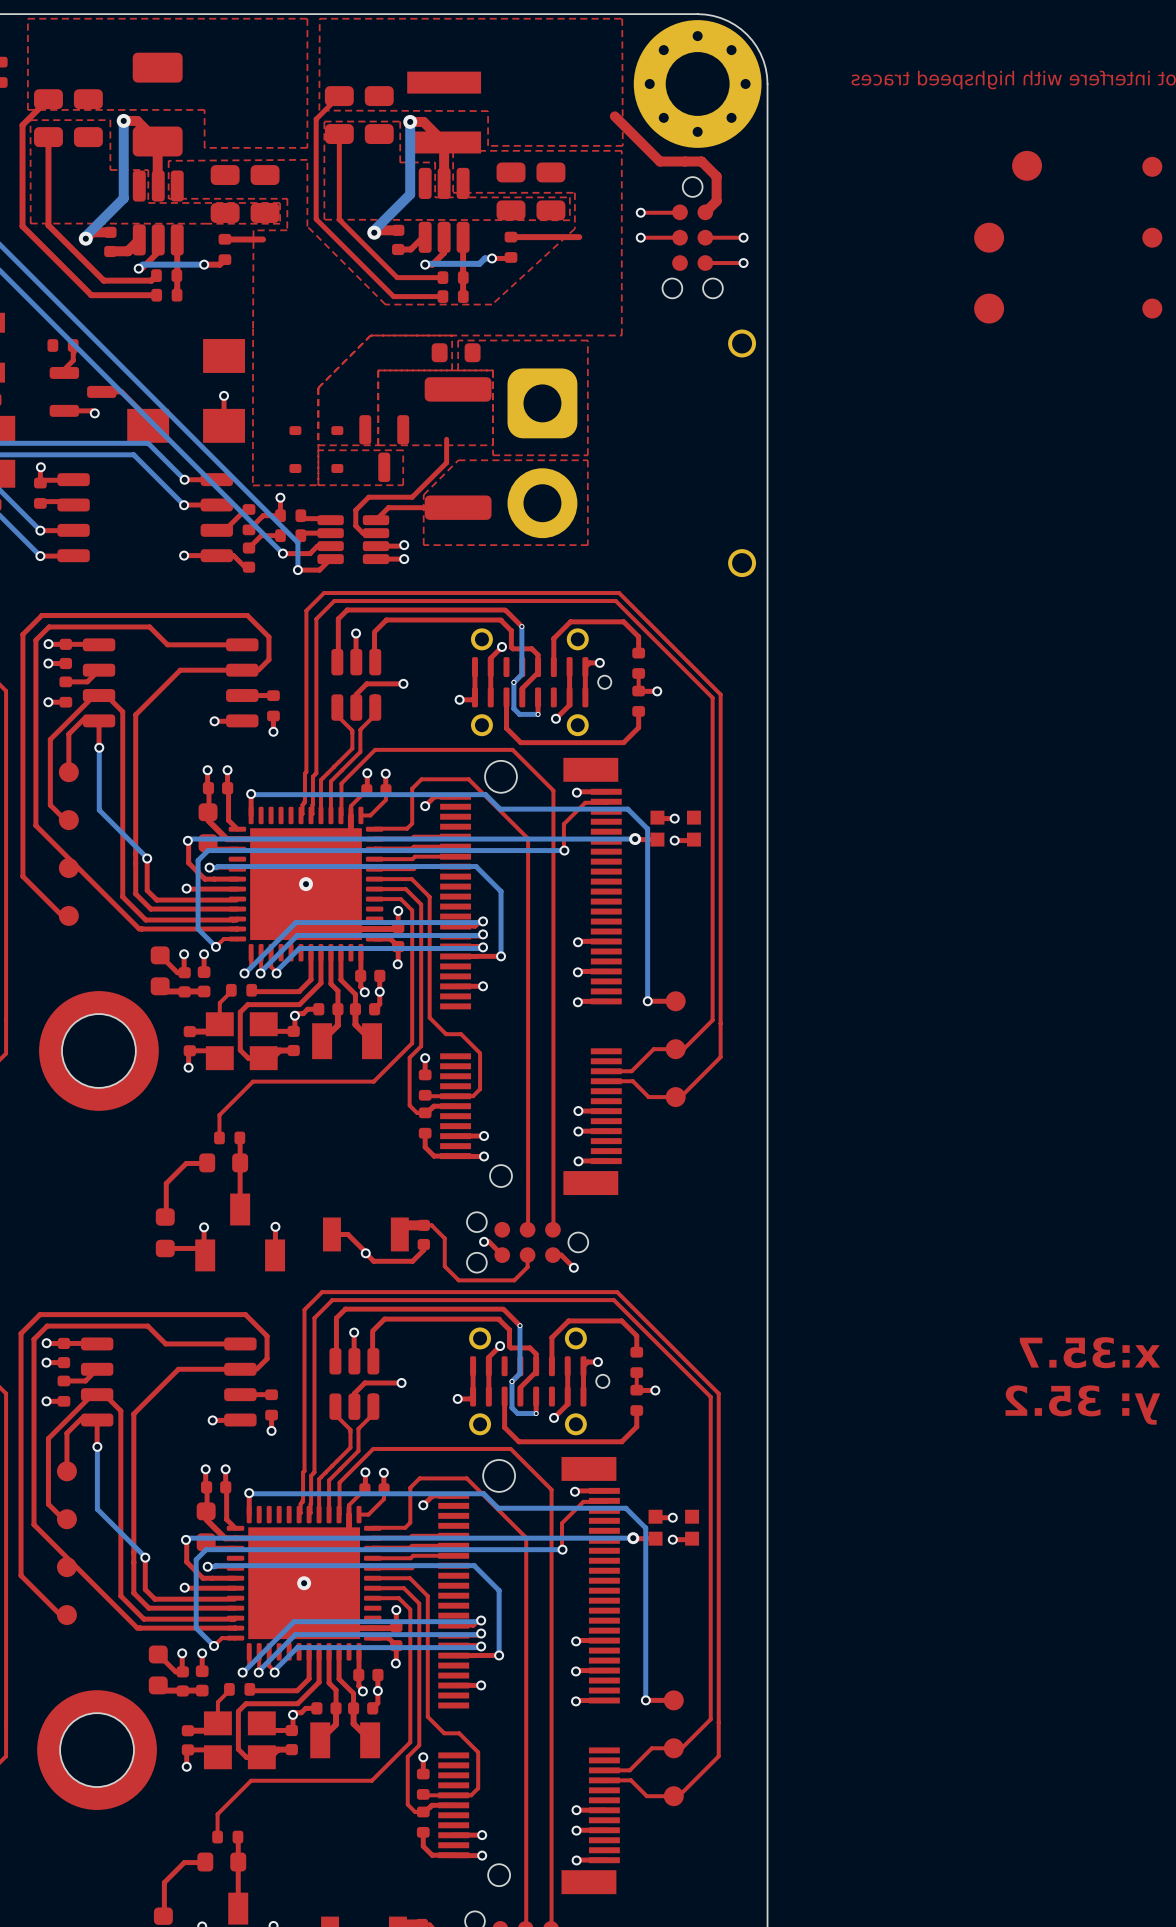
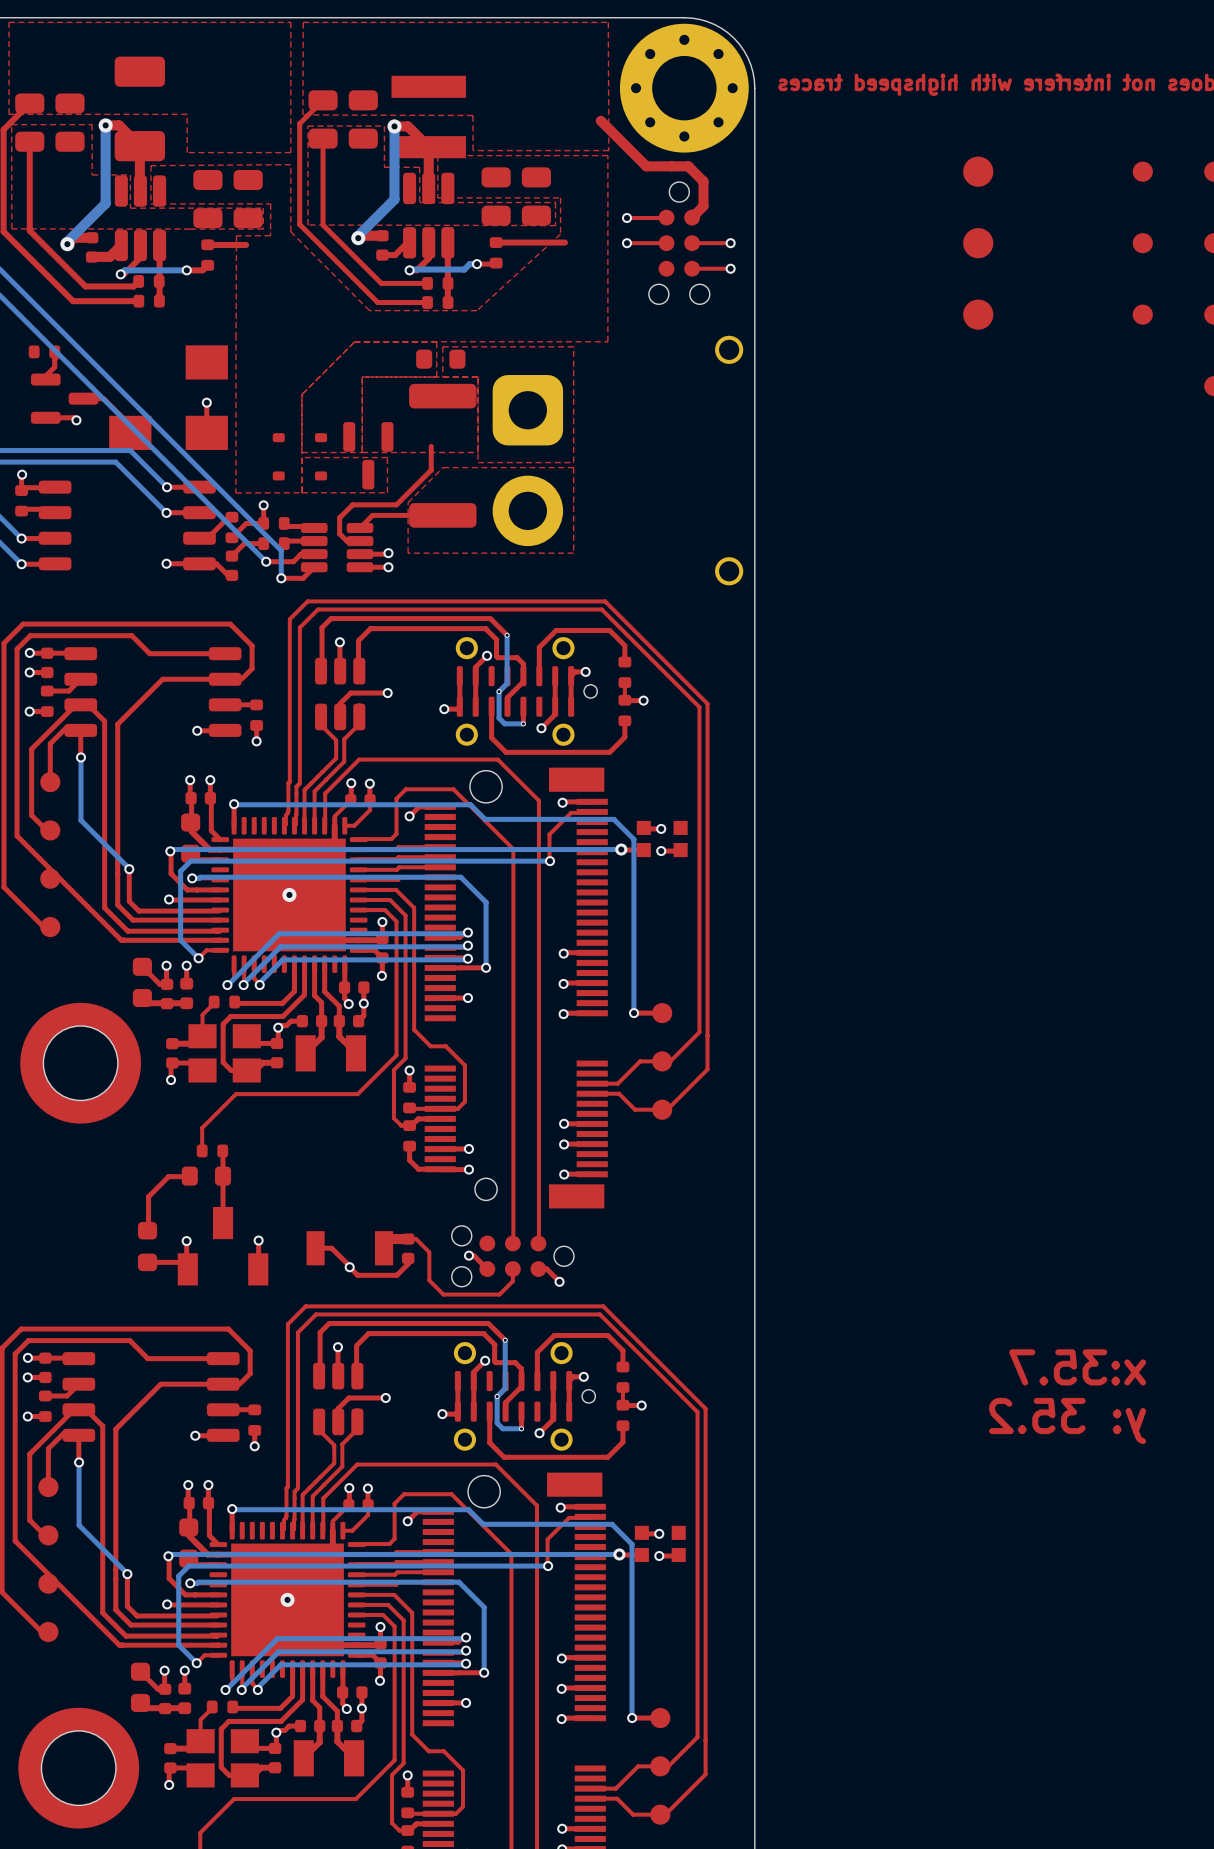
part position: (1027, 165) -> (978, 171)

